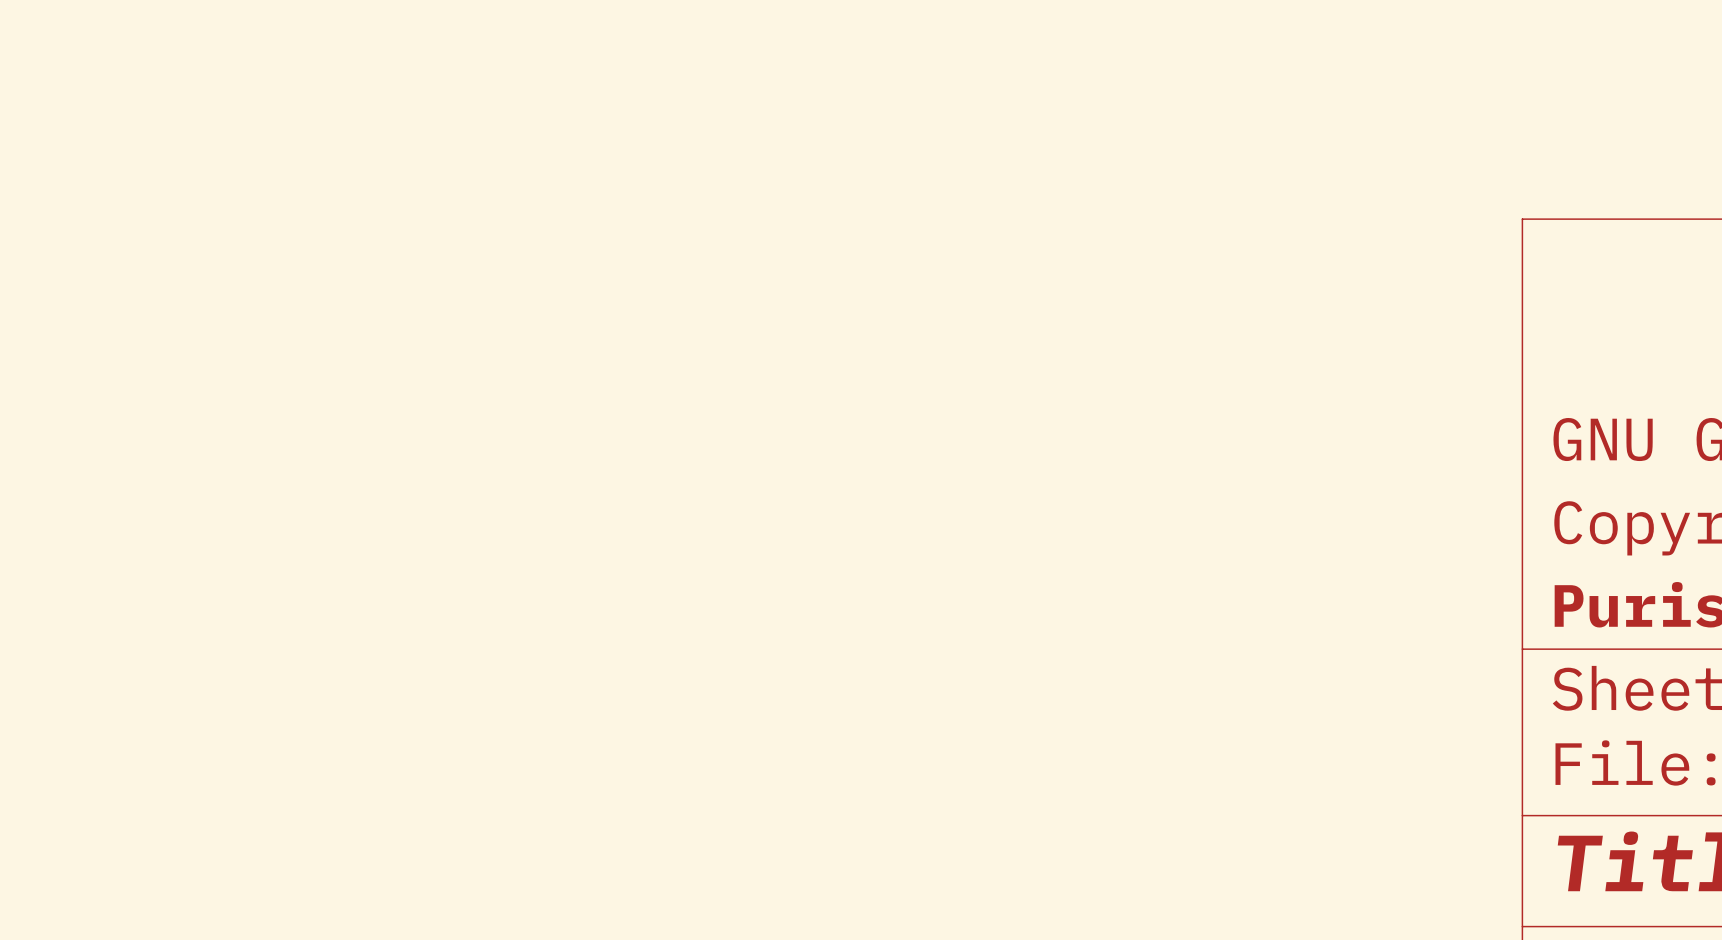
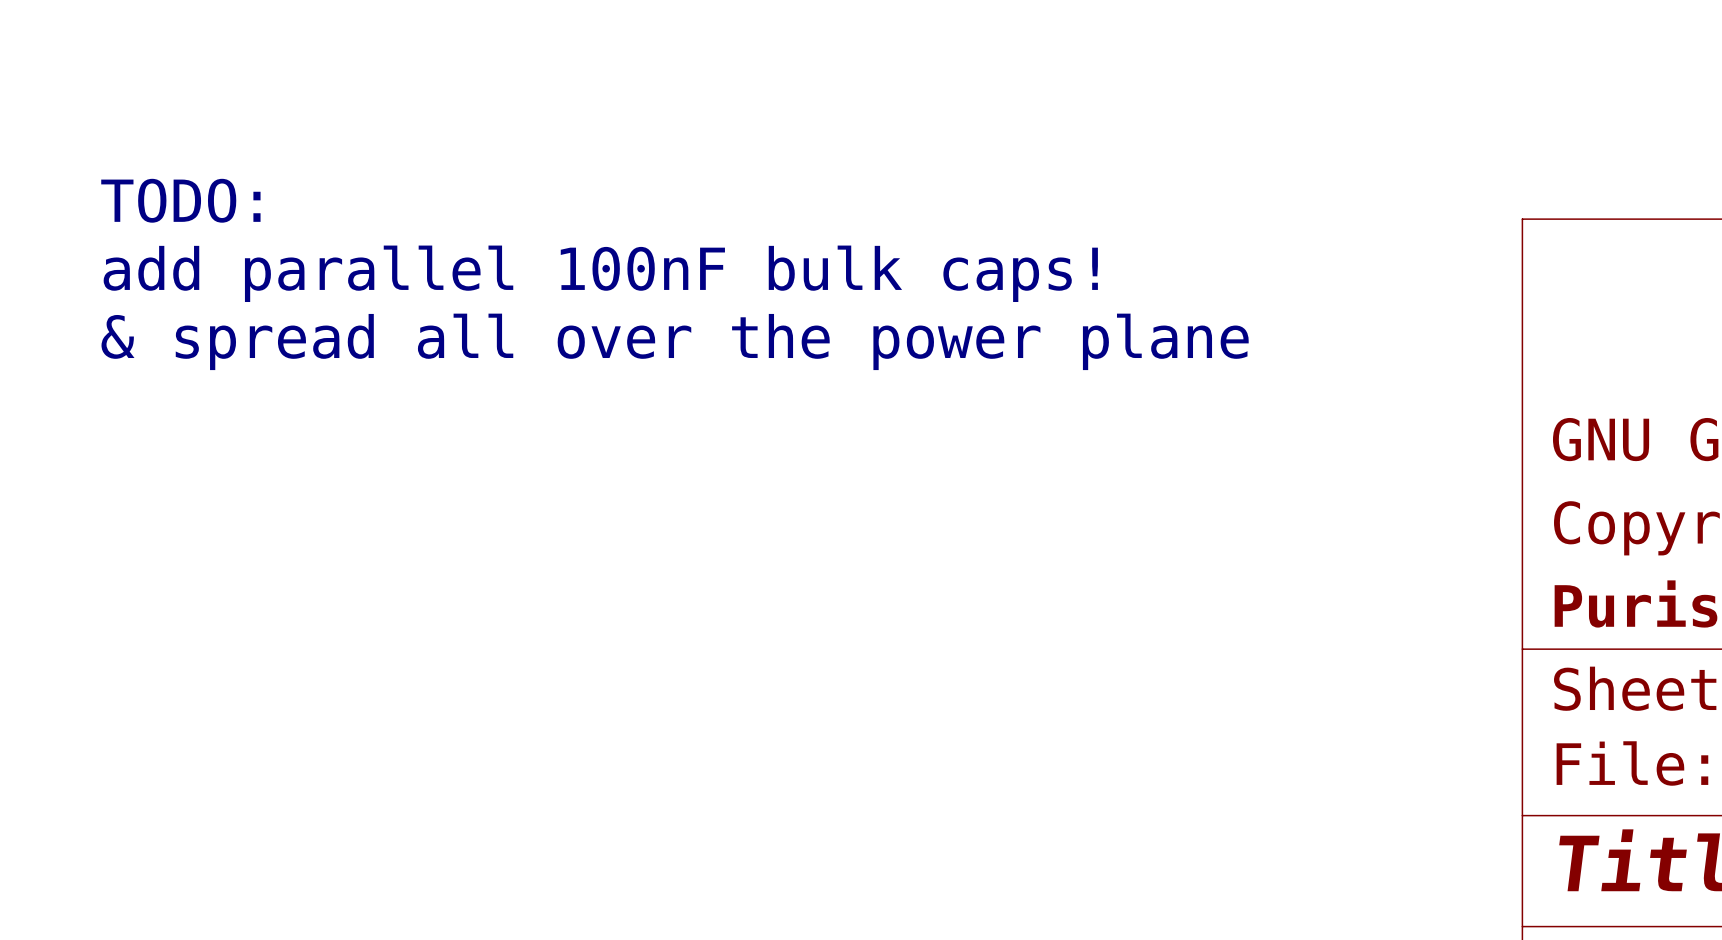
text: none -> TODO: (180, 200)
text: none -> add parallel 100nF bulk caps! (600, 273)
text: none -> & spread all over the power plane (675, 341)

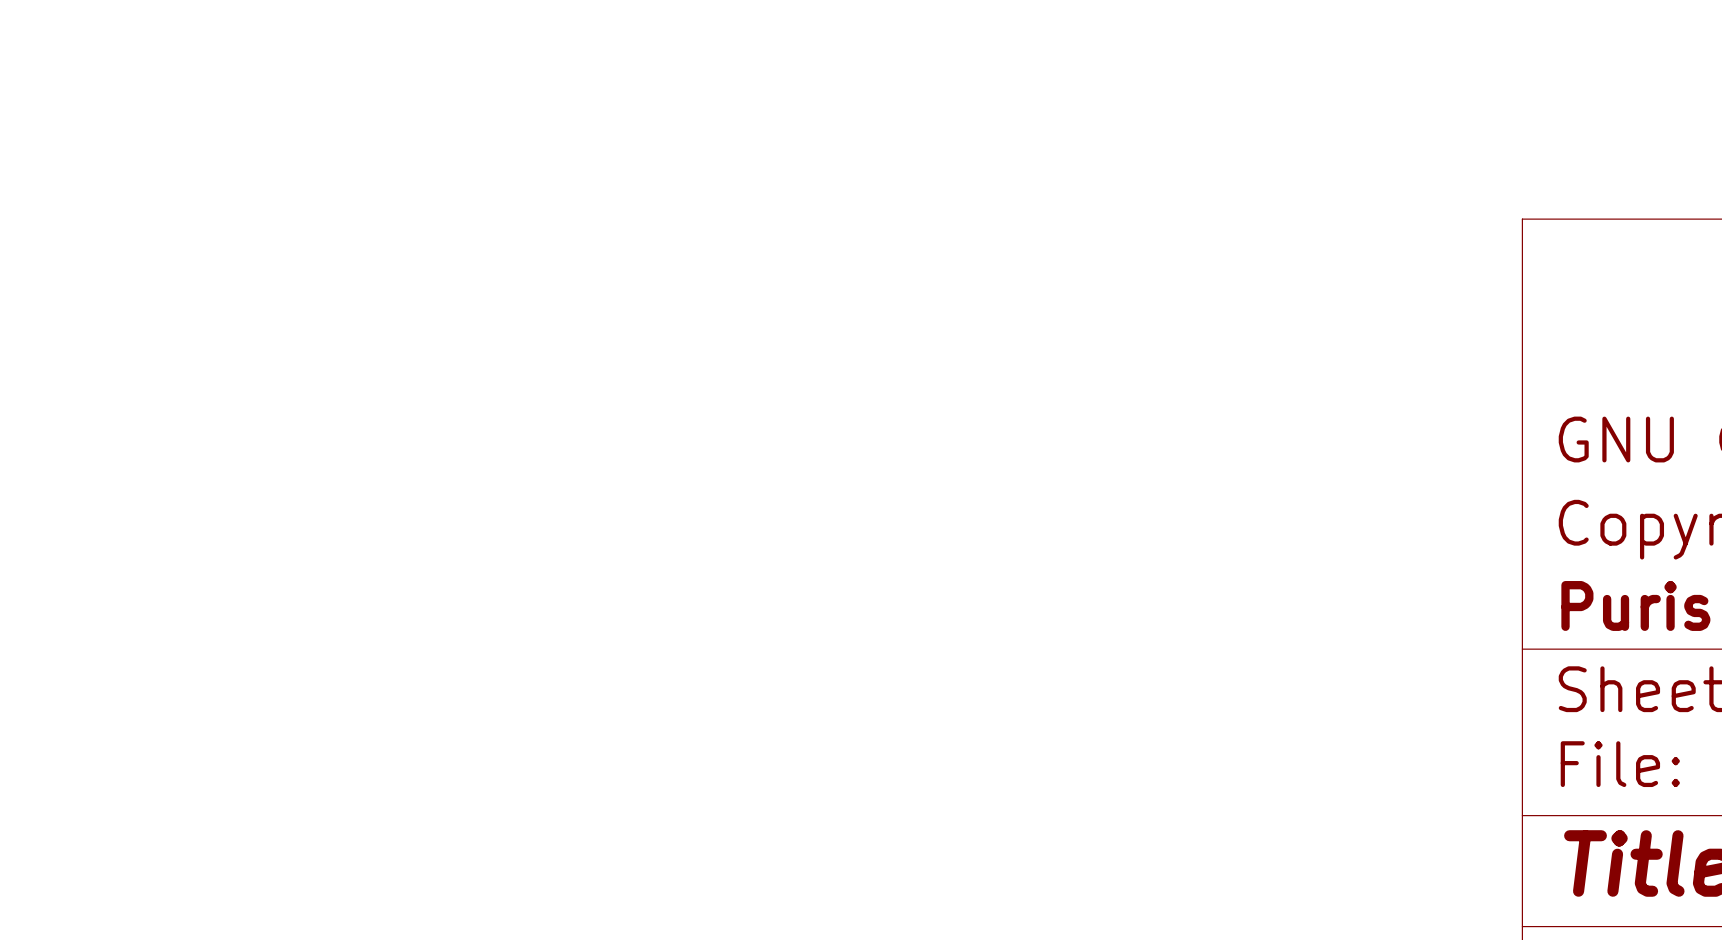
text: TODO: (180, 200) -> none
text: add parallel 100nF bulk caps! (600, 273) -> none
text: & spread all over the power plane (675, 341) -> none

